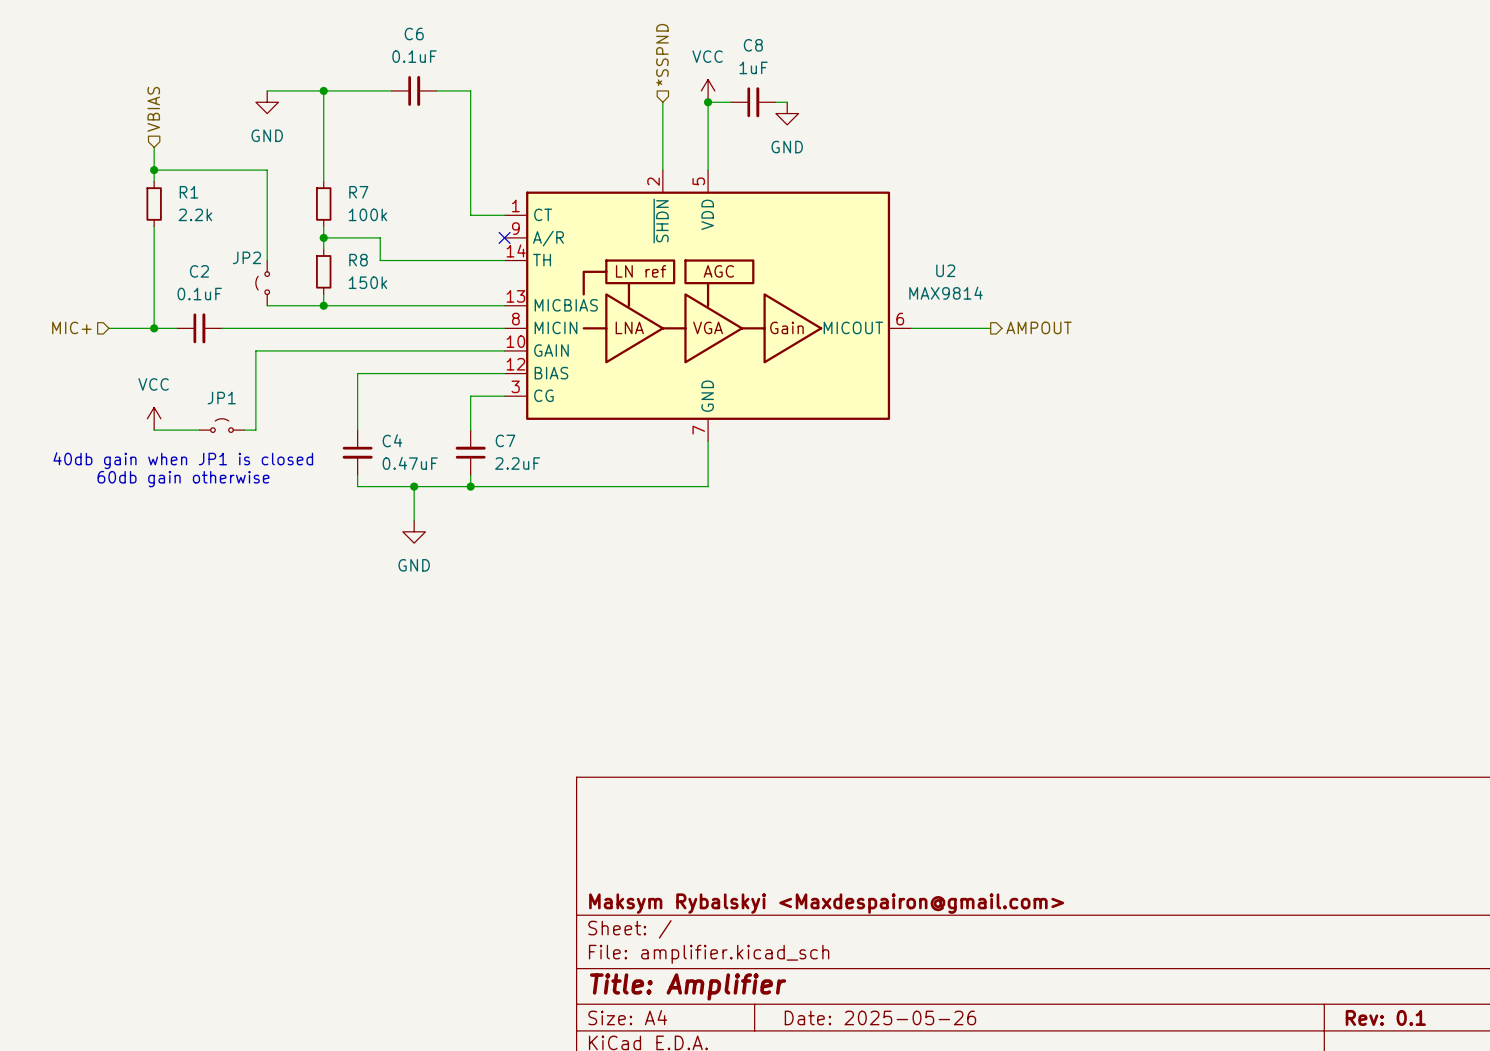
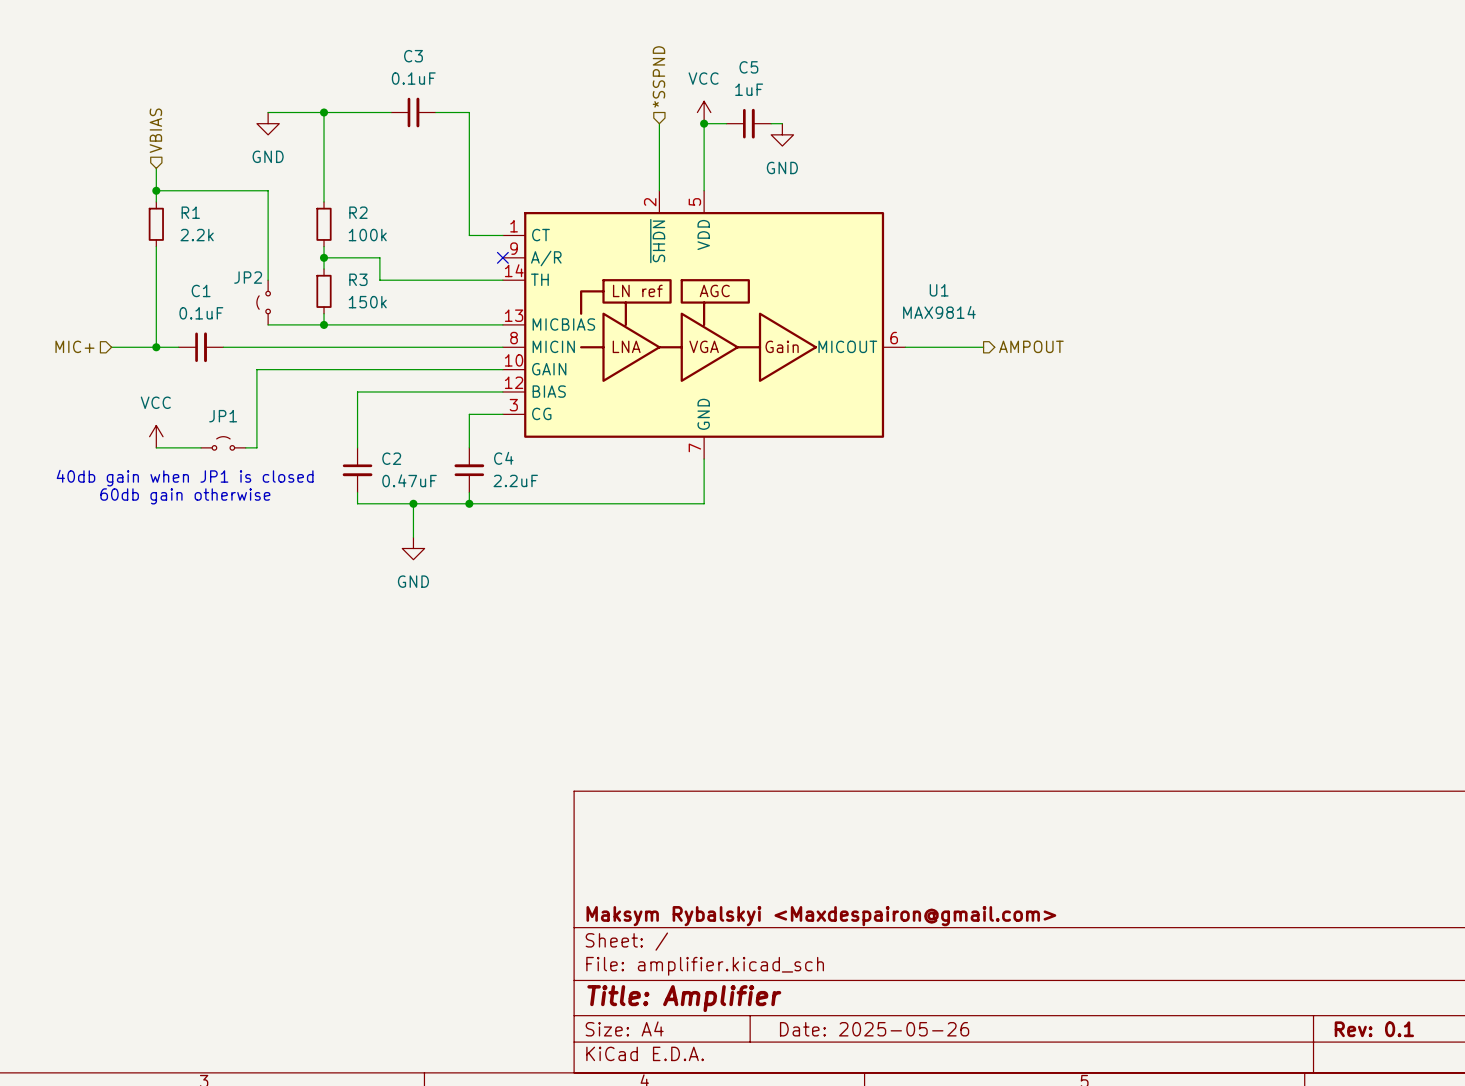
C6 name: C6 (414, 34) -> C3 (413, 56)
C8 name: C8 (753, 45) -> C5 (748, 67)
R7 name: R7 (358, 192) -> R2 (358, 212)
R8 name: R8 (358, 260) -> R3 (358, 279)
U2 name: U2 (945, 270) -> U1 (939, 290)
C2 name: C2 (199, 271) -> C1 (201, 290)
C4 name: C4 (392, 440) -> C2 (391, 458)
C7 name: C7 (505, 440) -> C4 (503, 458)

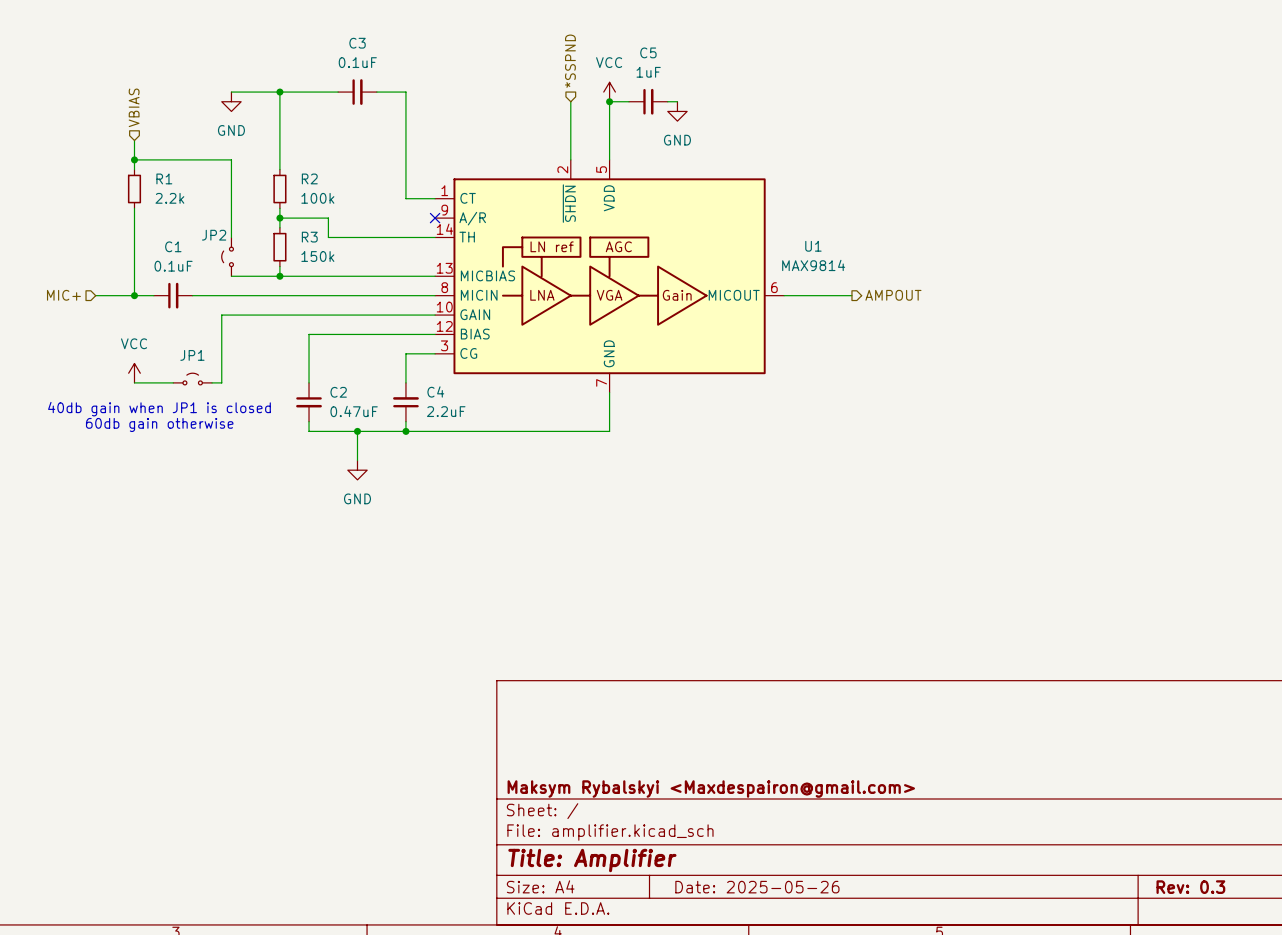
title block: Rev: 0.1 (1374, 1029) -> Rev: 0.3 (1190, 887)

